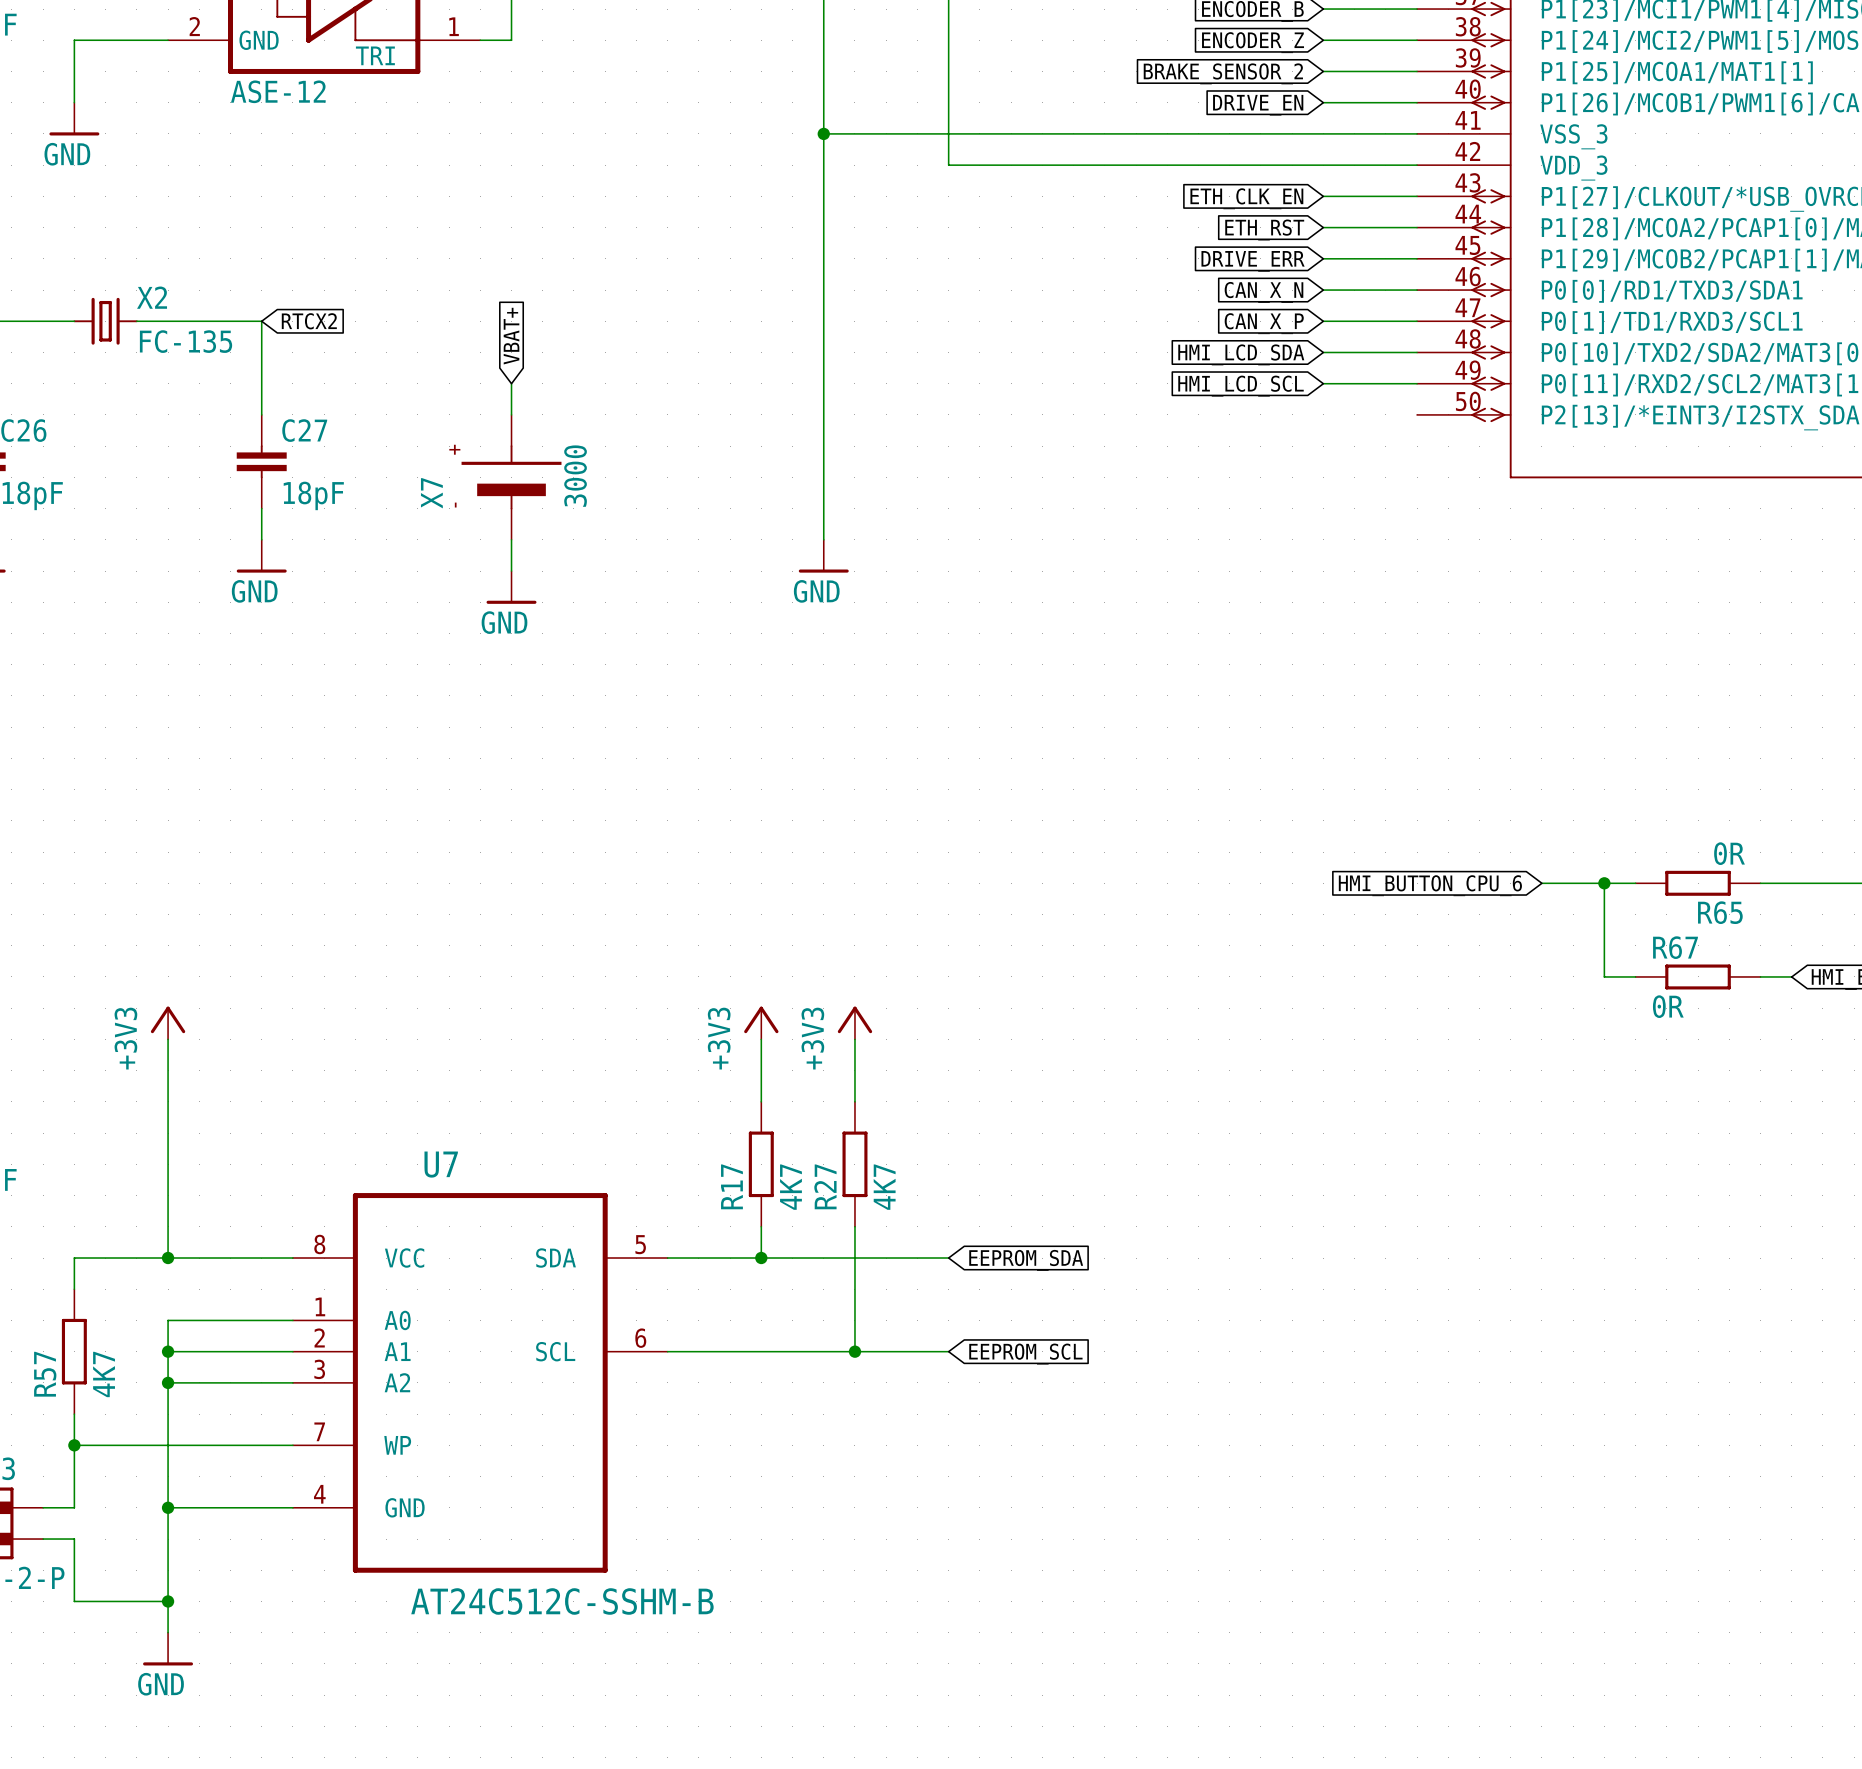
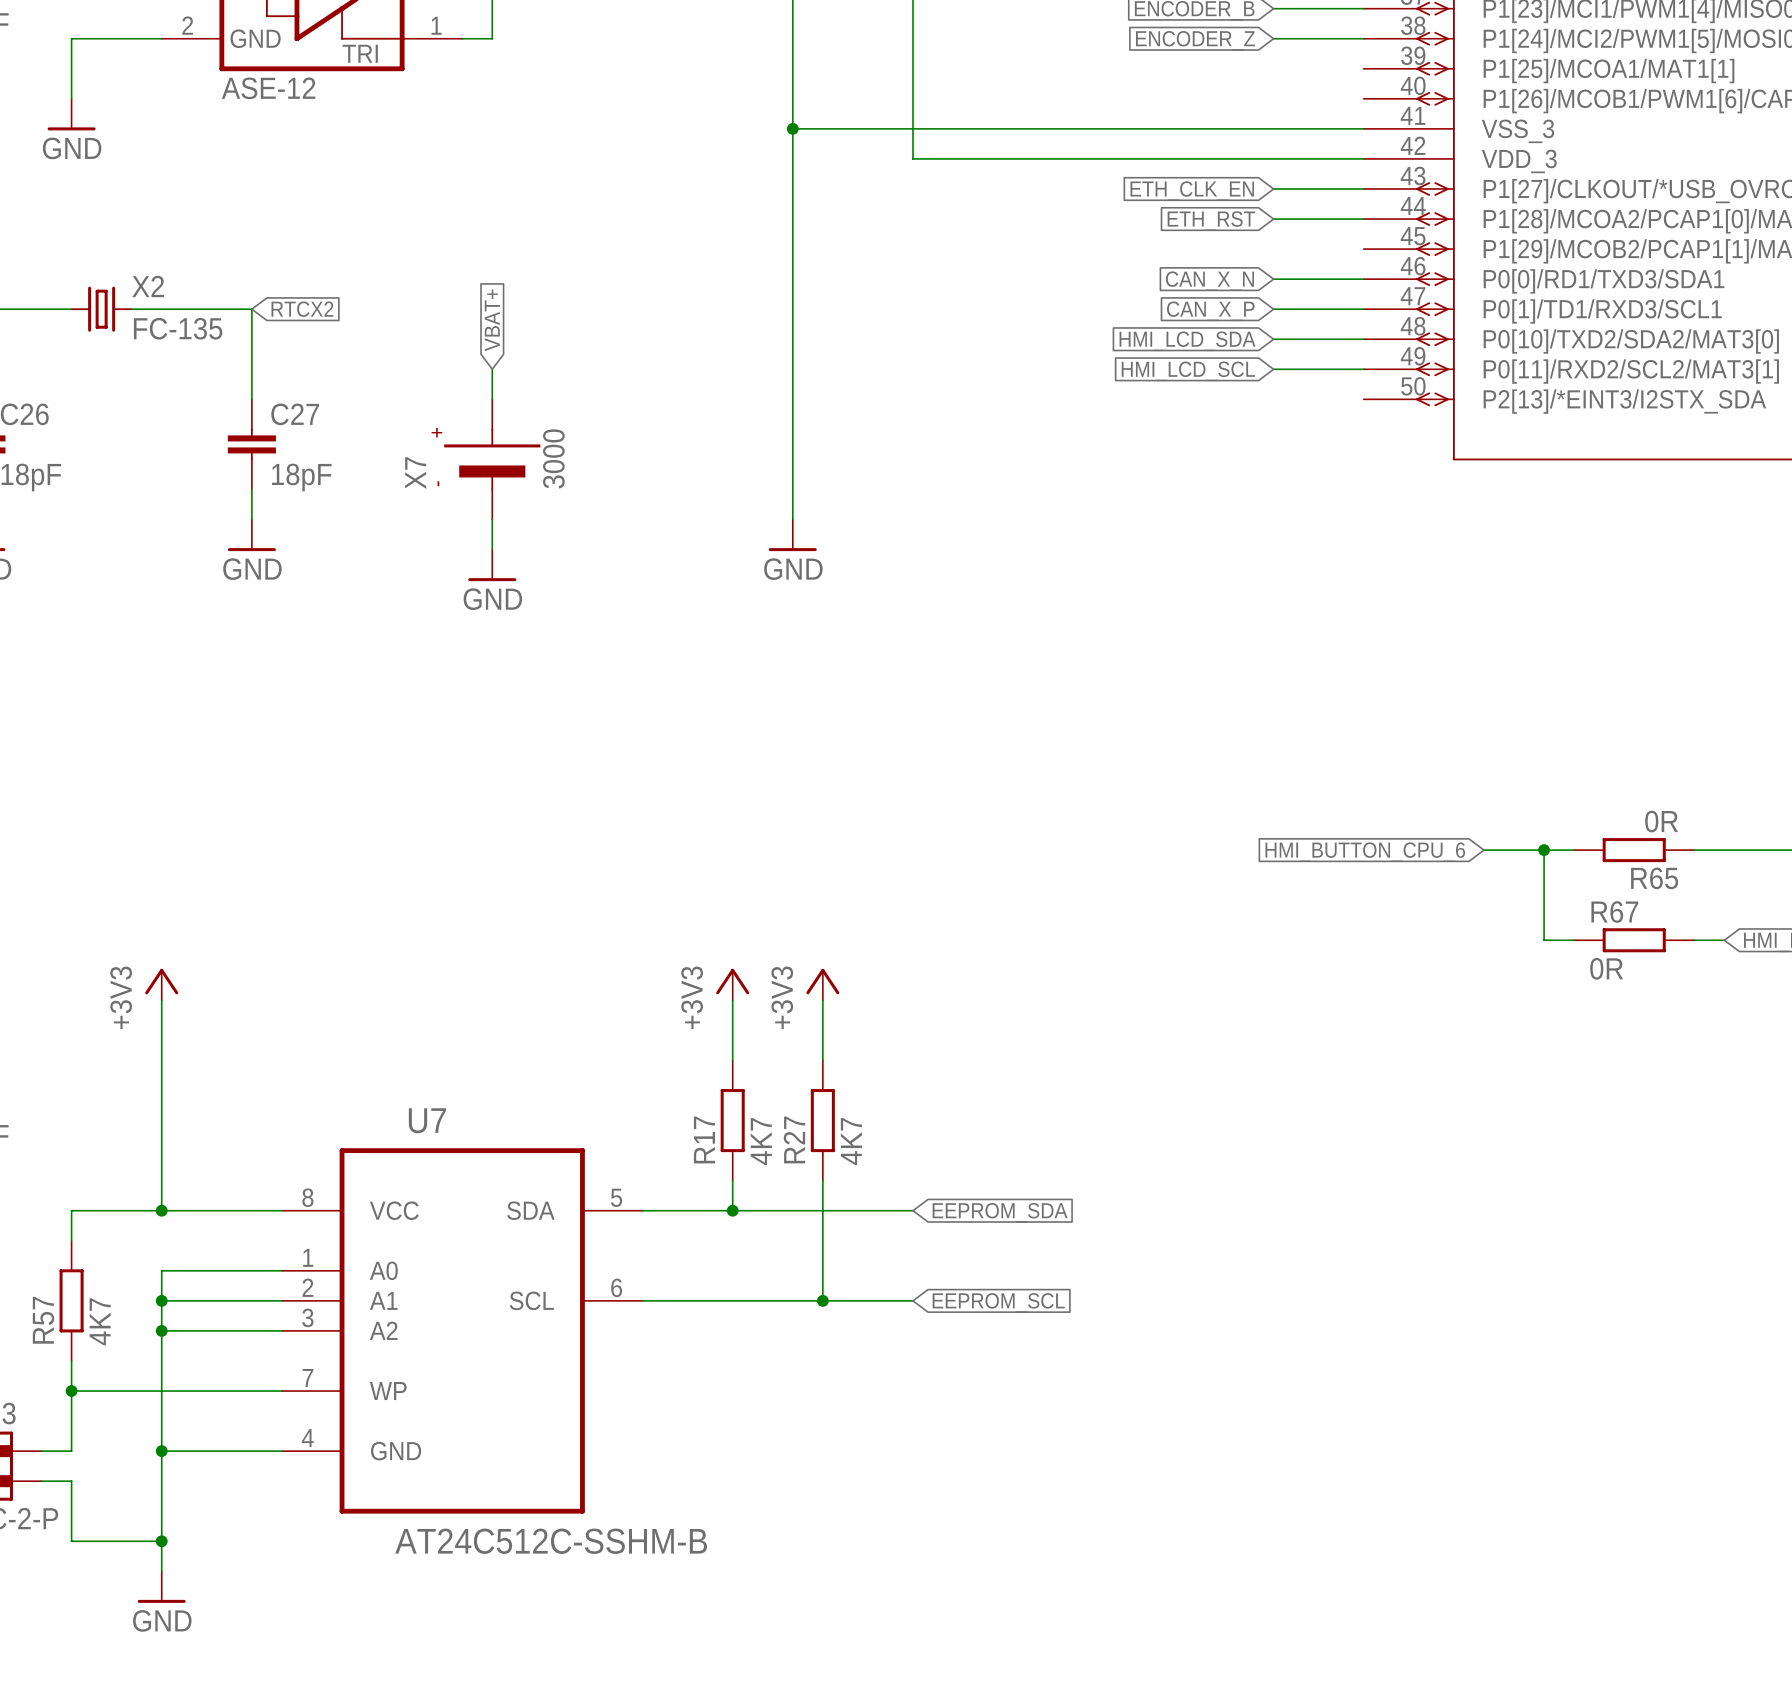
wire: (1323, 71) (1417, 71) -> none
global label: BRAKE_SENSOR_2 (1223, 73) -> none
wire: (1323, 102) (1417, 102) -> none
global label: DRIVE_EN (1258, 105) -> none
wire: (1323, 258) (1417, 258) -> none
global label: DRIVE_ERR (1253, 261) -> none

